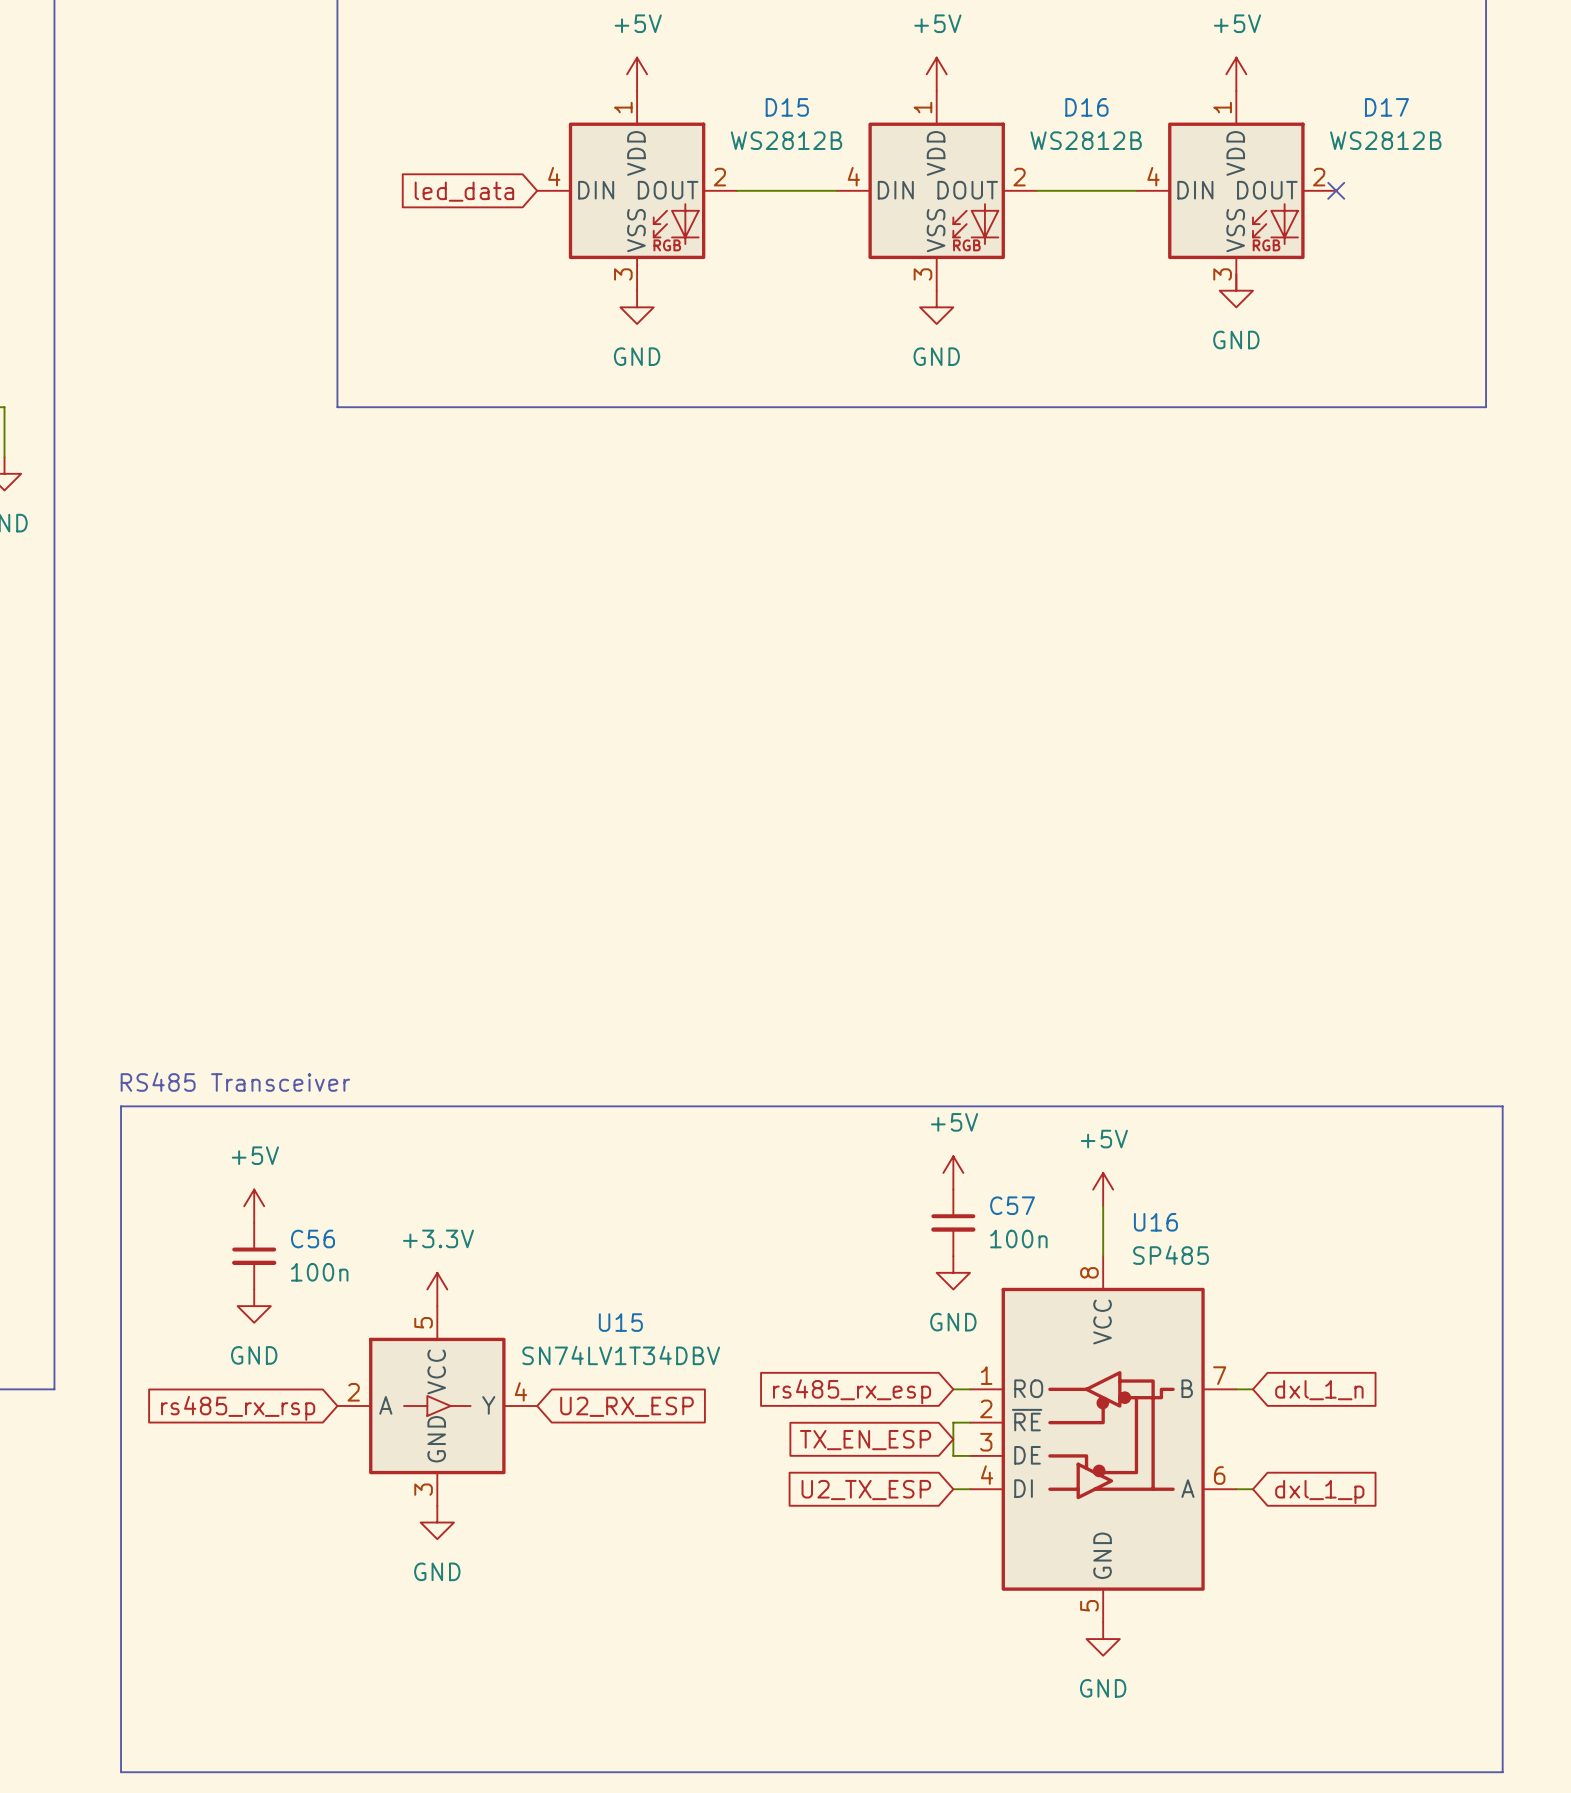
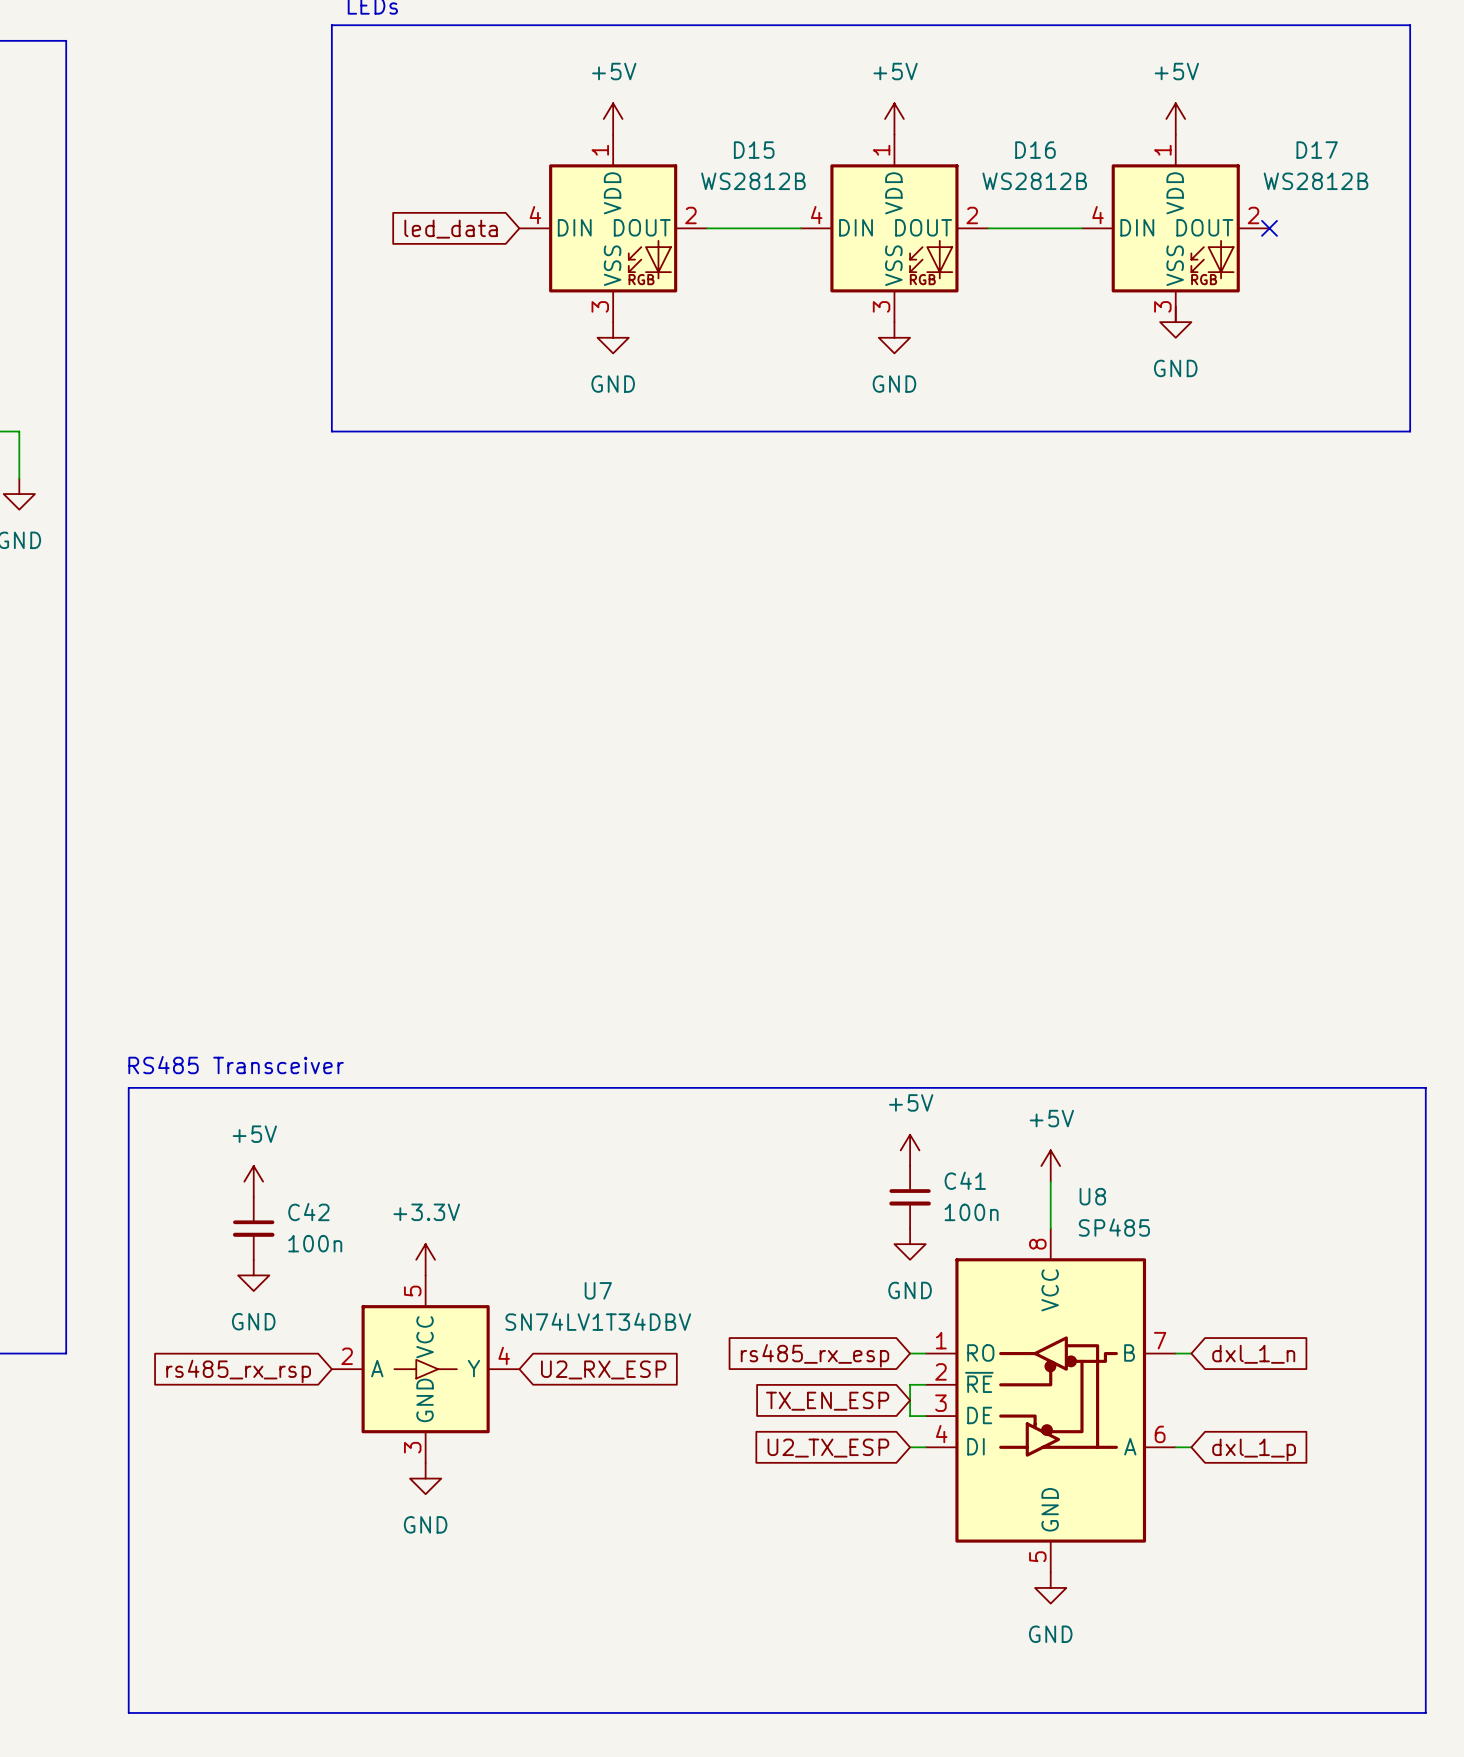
C57 name: C57 (1012, 1205) -> C41 (965, 1180)
U16 name: U16 (1155, 1222) -> U8 (1092, 1196)
C56 name: C56 (312, 1239) -> C42 (308, 1212)
U15 name: U15 (620, 1322) -> U7 (598, 1290)

